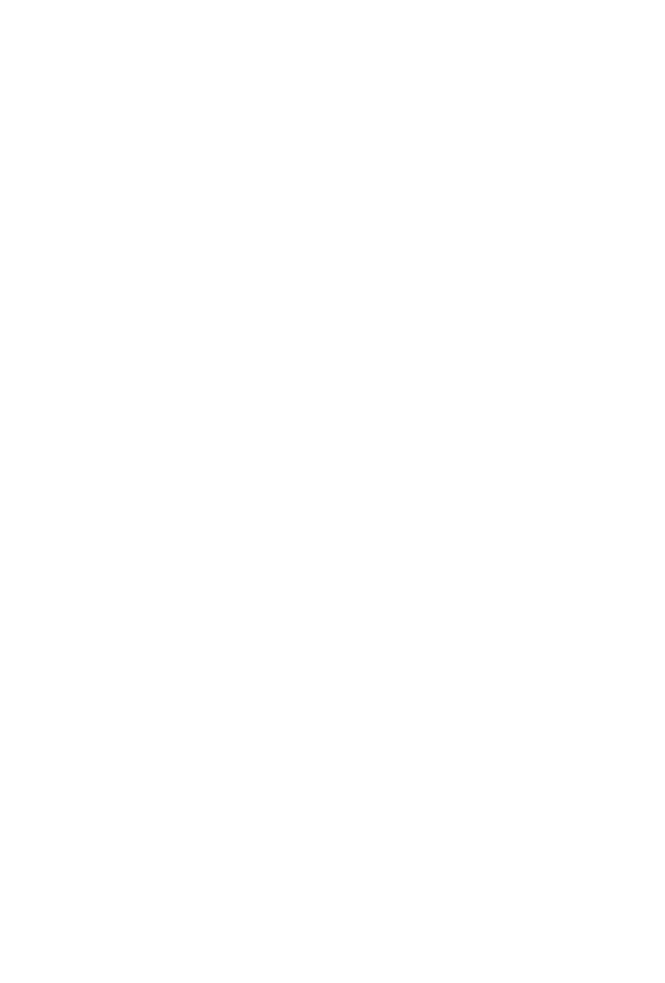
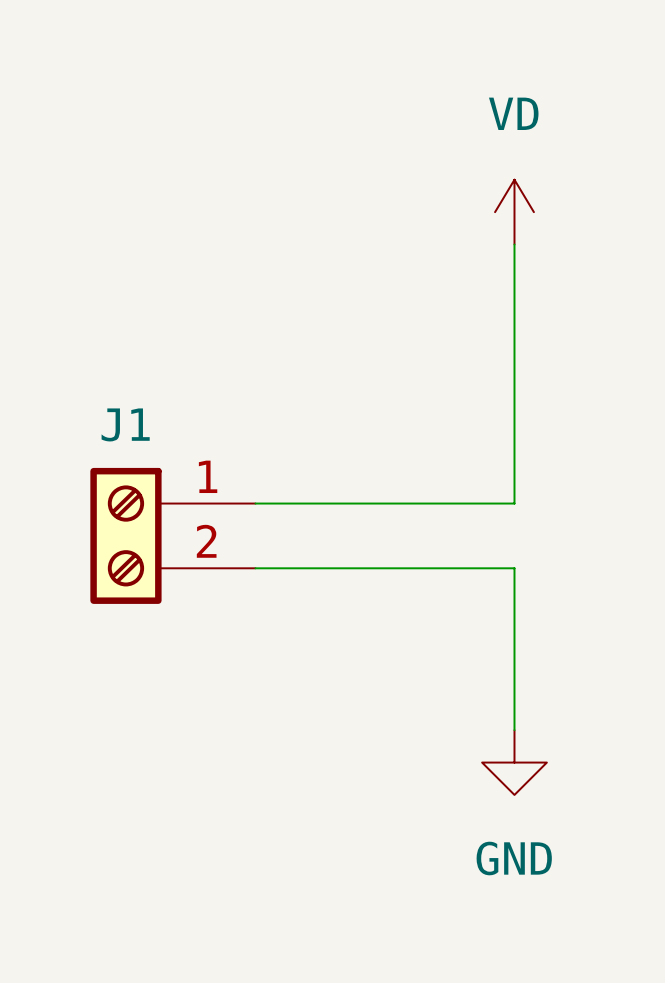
power symbol: none -> VD (514, 212)
wire: none -> (514, 244) (514, 503) (255, 503)
J1: none -> (172, 535)
wire: none -> (255, 568) (514, 568) (514, 730)
power symbol: none -> GND (514, 762)

